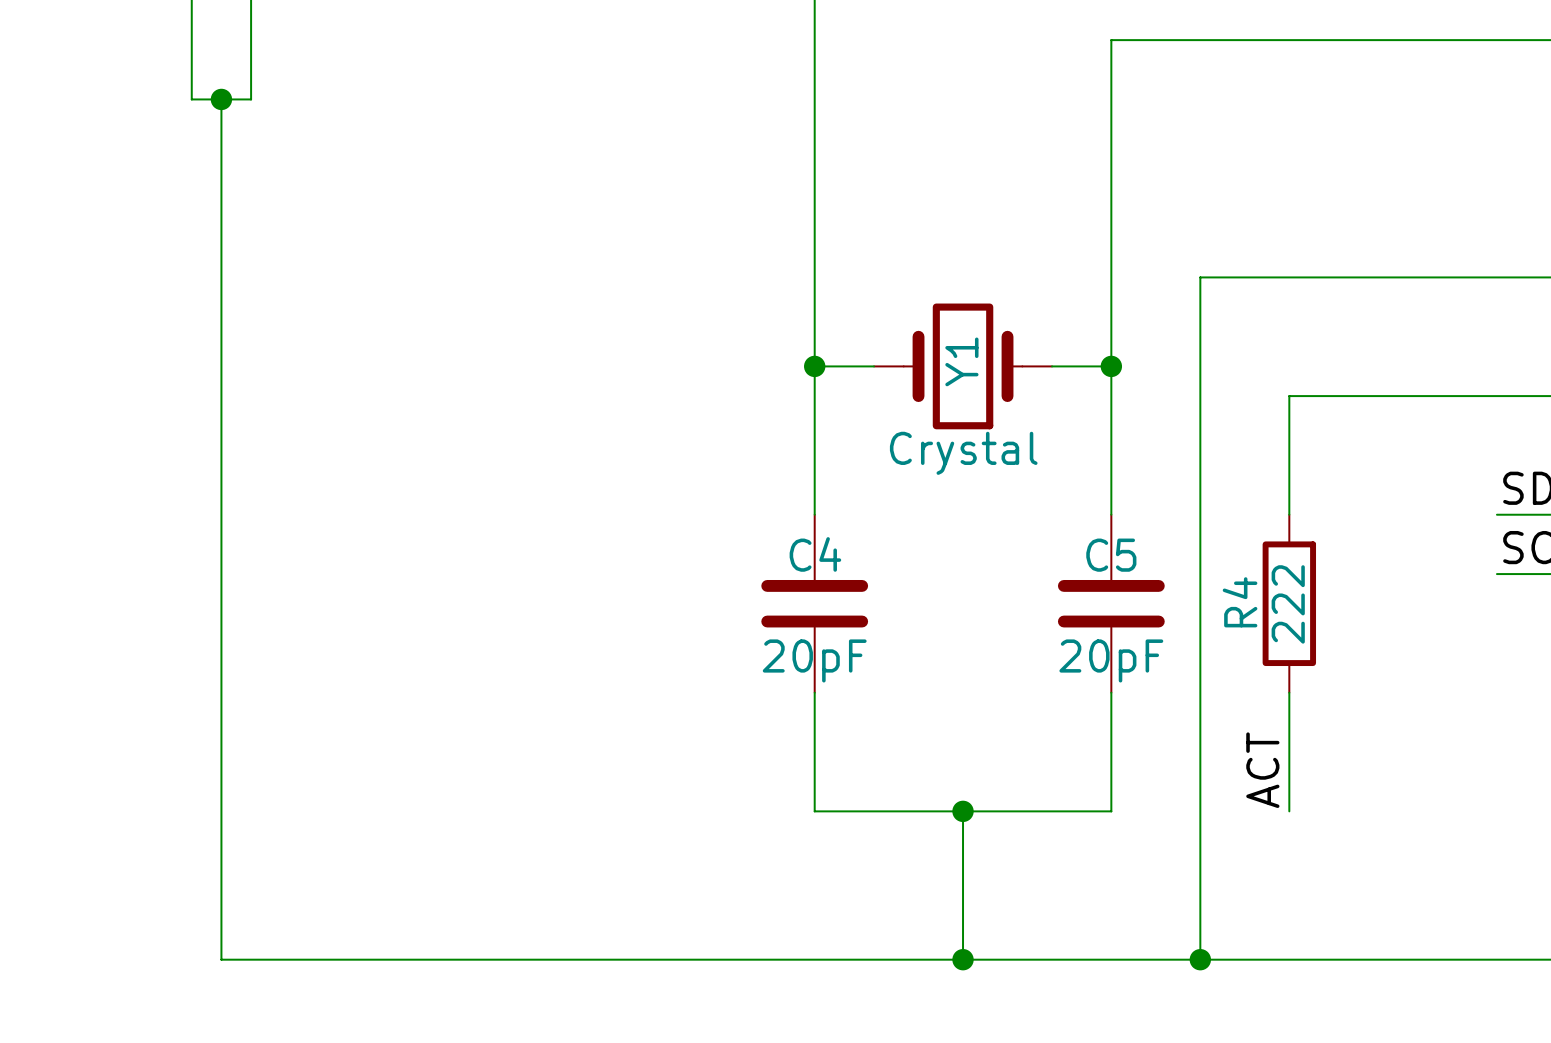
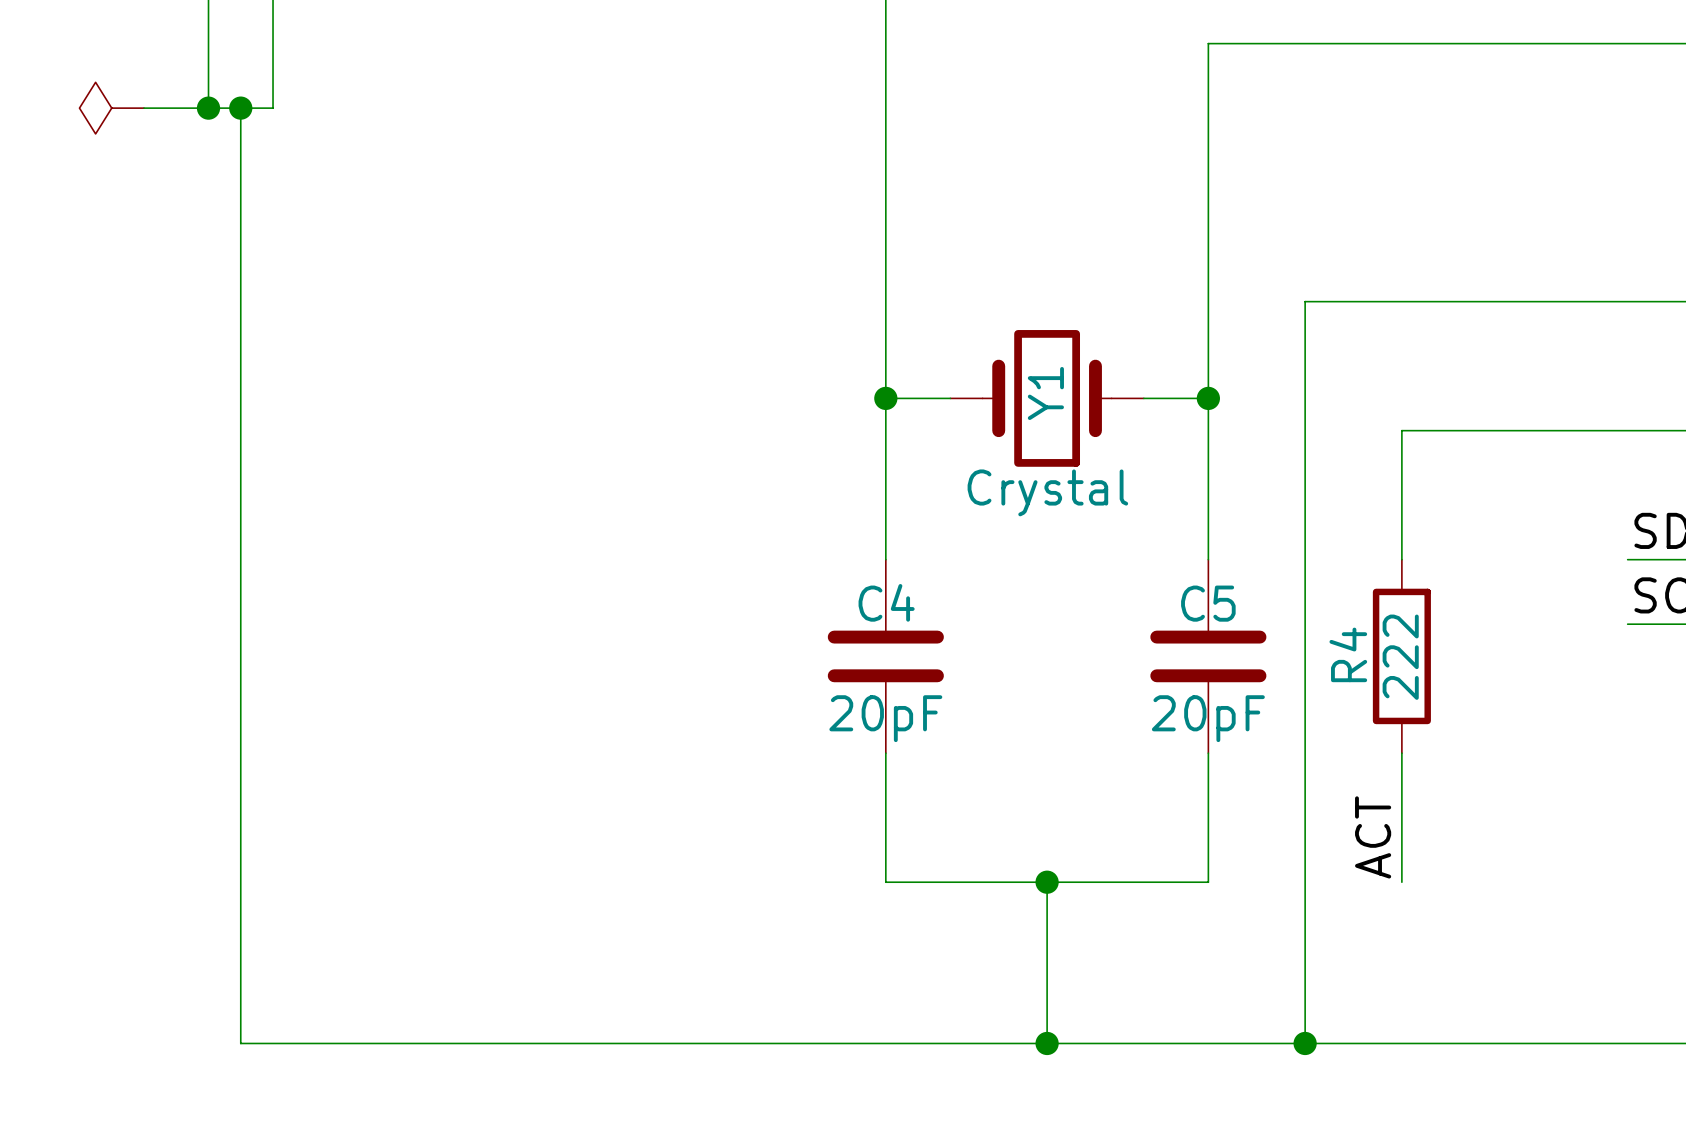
power symbol: none -> (111, 108)
wire: none -> (144, 108) (208, 108)
junction: none -> (208, 108)

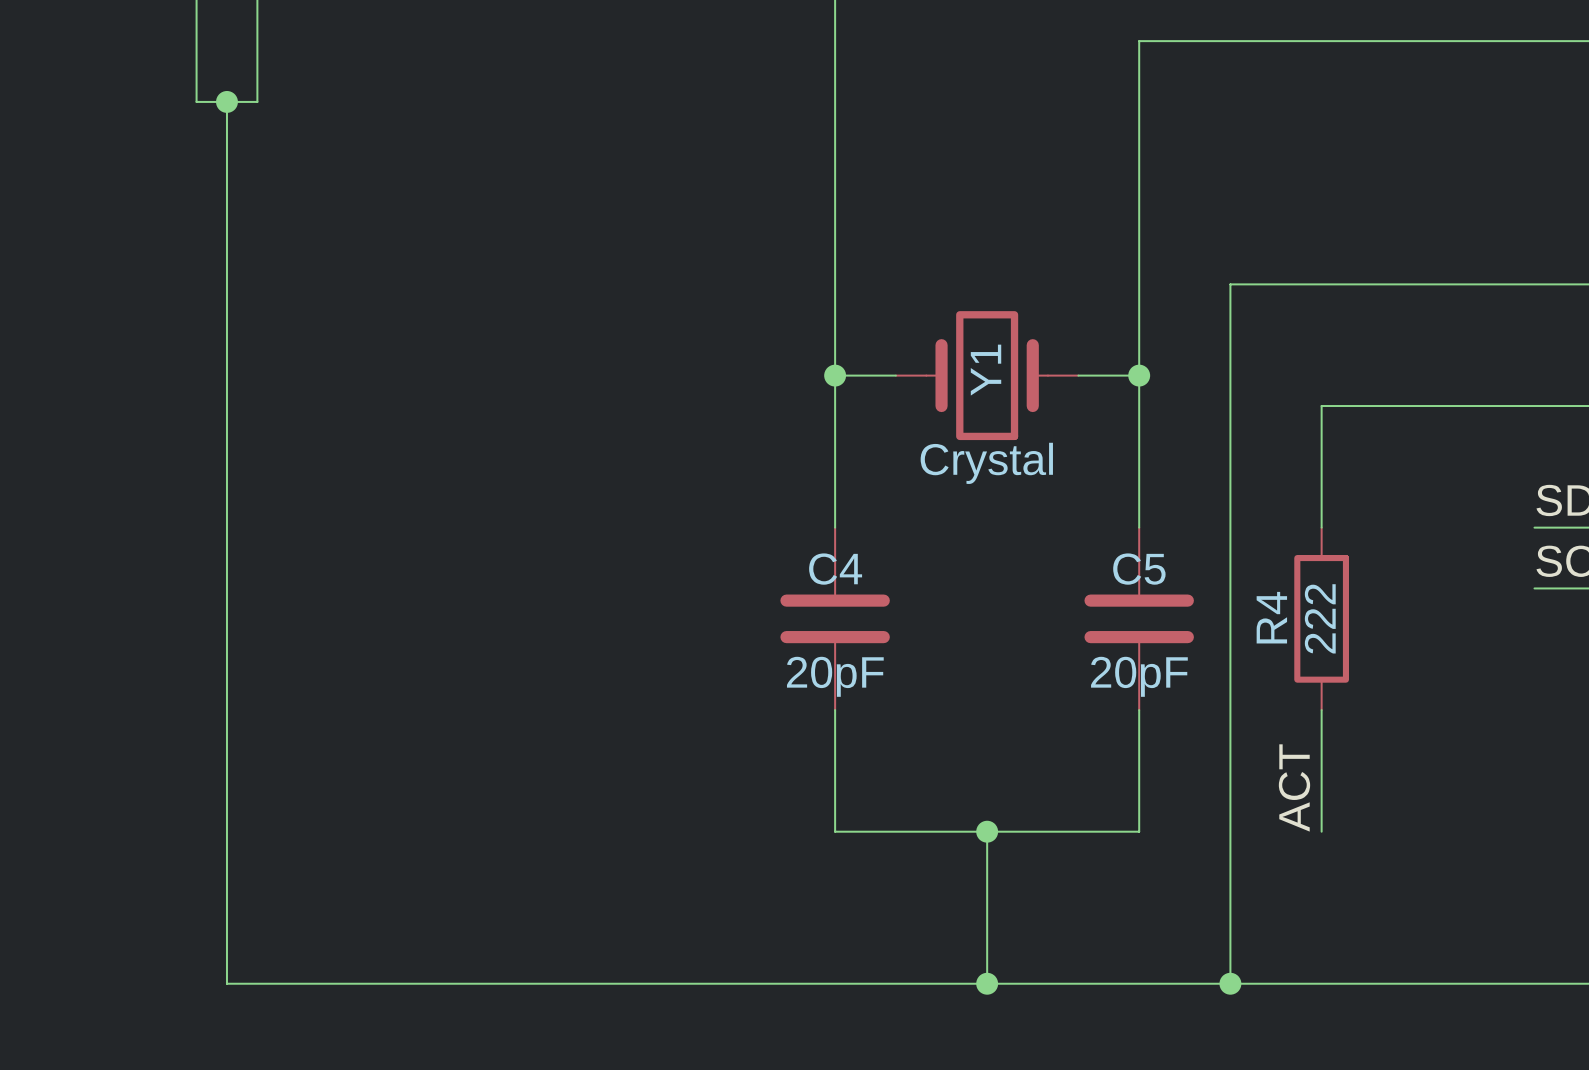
power symbol: (111, 108) -> none
wire: (144, 108) (208, 108) -> none
junction: (208, 108) -> none

